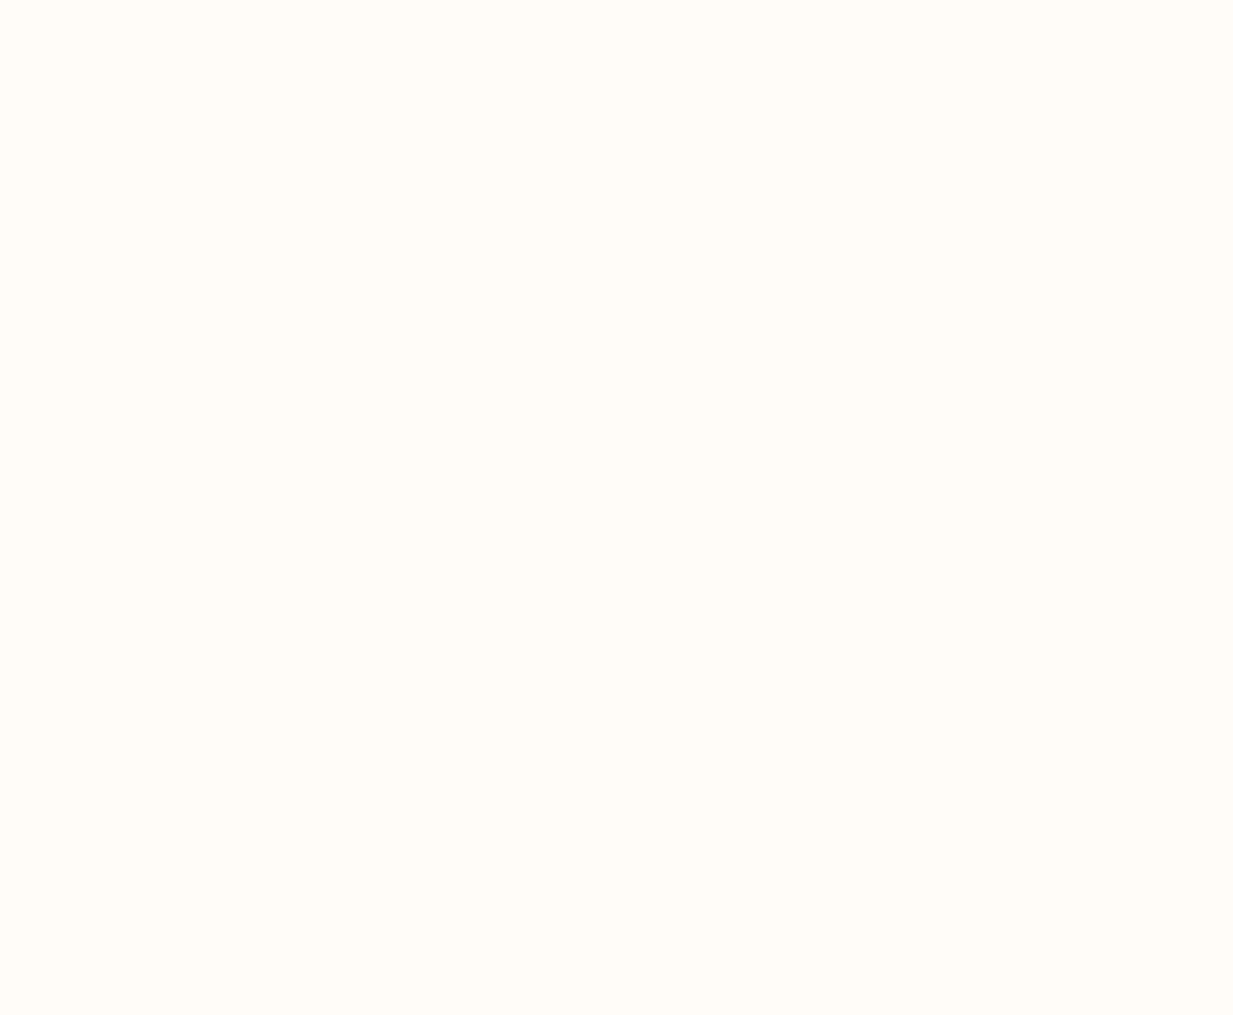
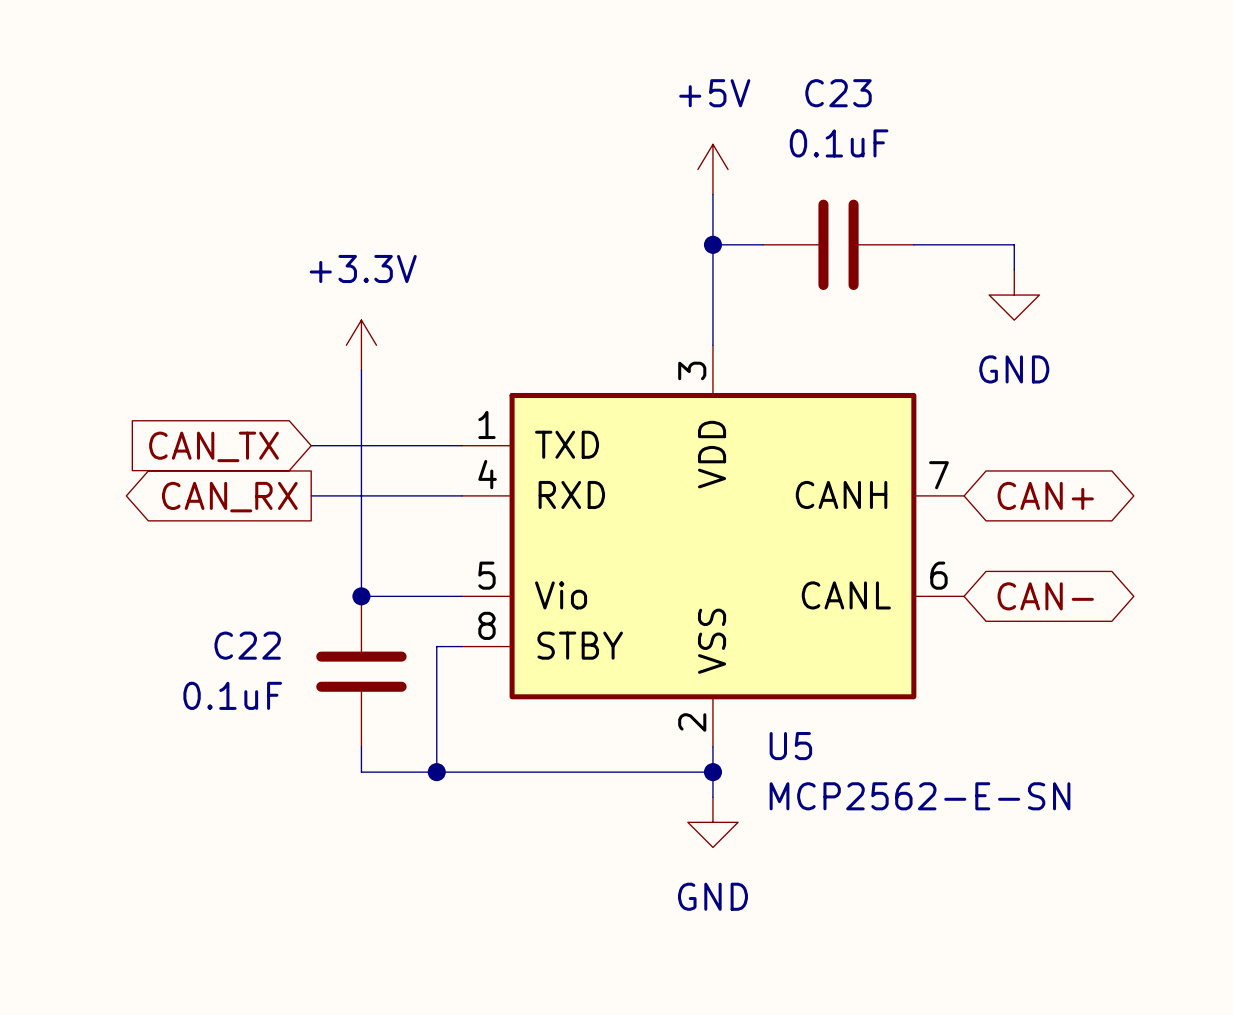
power symbol: none -> +5V (712, 169)
wire: none -> (712, 194) (712, 345)
wire: none -> (712, 244) (763, 244)
junction: none -> (712, 244)
C23: none -> 0.1uF (838, 244)
wire: none -> (913, 244) (1014, 244) (1014, 269)
power symbol: none -> GND (1014, 295)
power symbol: none -> +3.3V (361, 345)
wire: none -> (361, 370) (361, 596) (461, 596)
wire: none -> (311, 445) (461, 445)
global label: none -> CAN_TX (214, 446)
wire: none -> (311, 495) (461, 495)
global label: none -> CAN+ (1045, 495)
global label: none -> CAN_RX (229, 497)
U5: none -> MCP2562-E-SN (712, 546)
junction: none -> (361, 596)
global label: none -> CAN- (1045, 596)
wire: none -> (461, 646) (436, 646) (436, 772)
C22: none -> 0.1uF (361, 671)
wire: none -> (361, 747) (361, 772) (712, 772)
wire: none -> (712, 747) (712, 797)
junction: none -> (436, 772)
junction: none -> (712, 772)
power symbol: none -> GND (712, 822)

